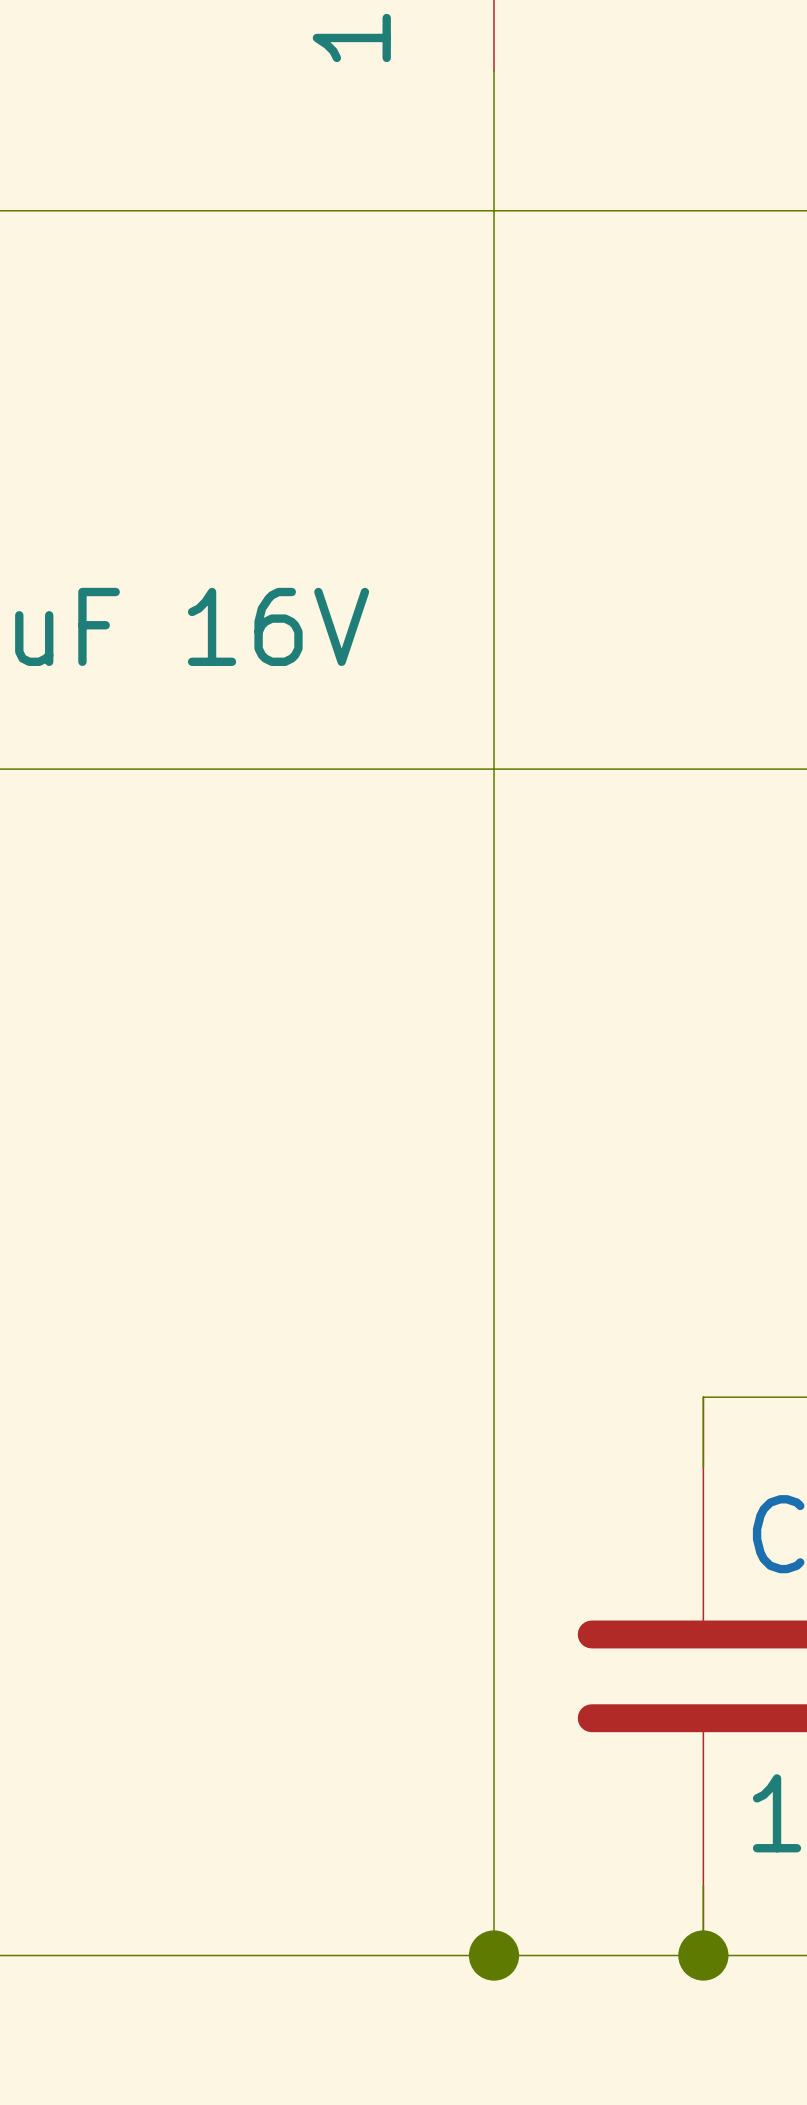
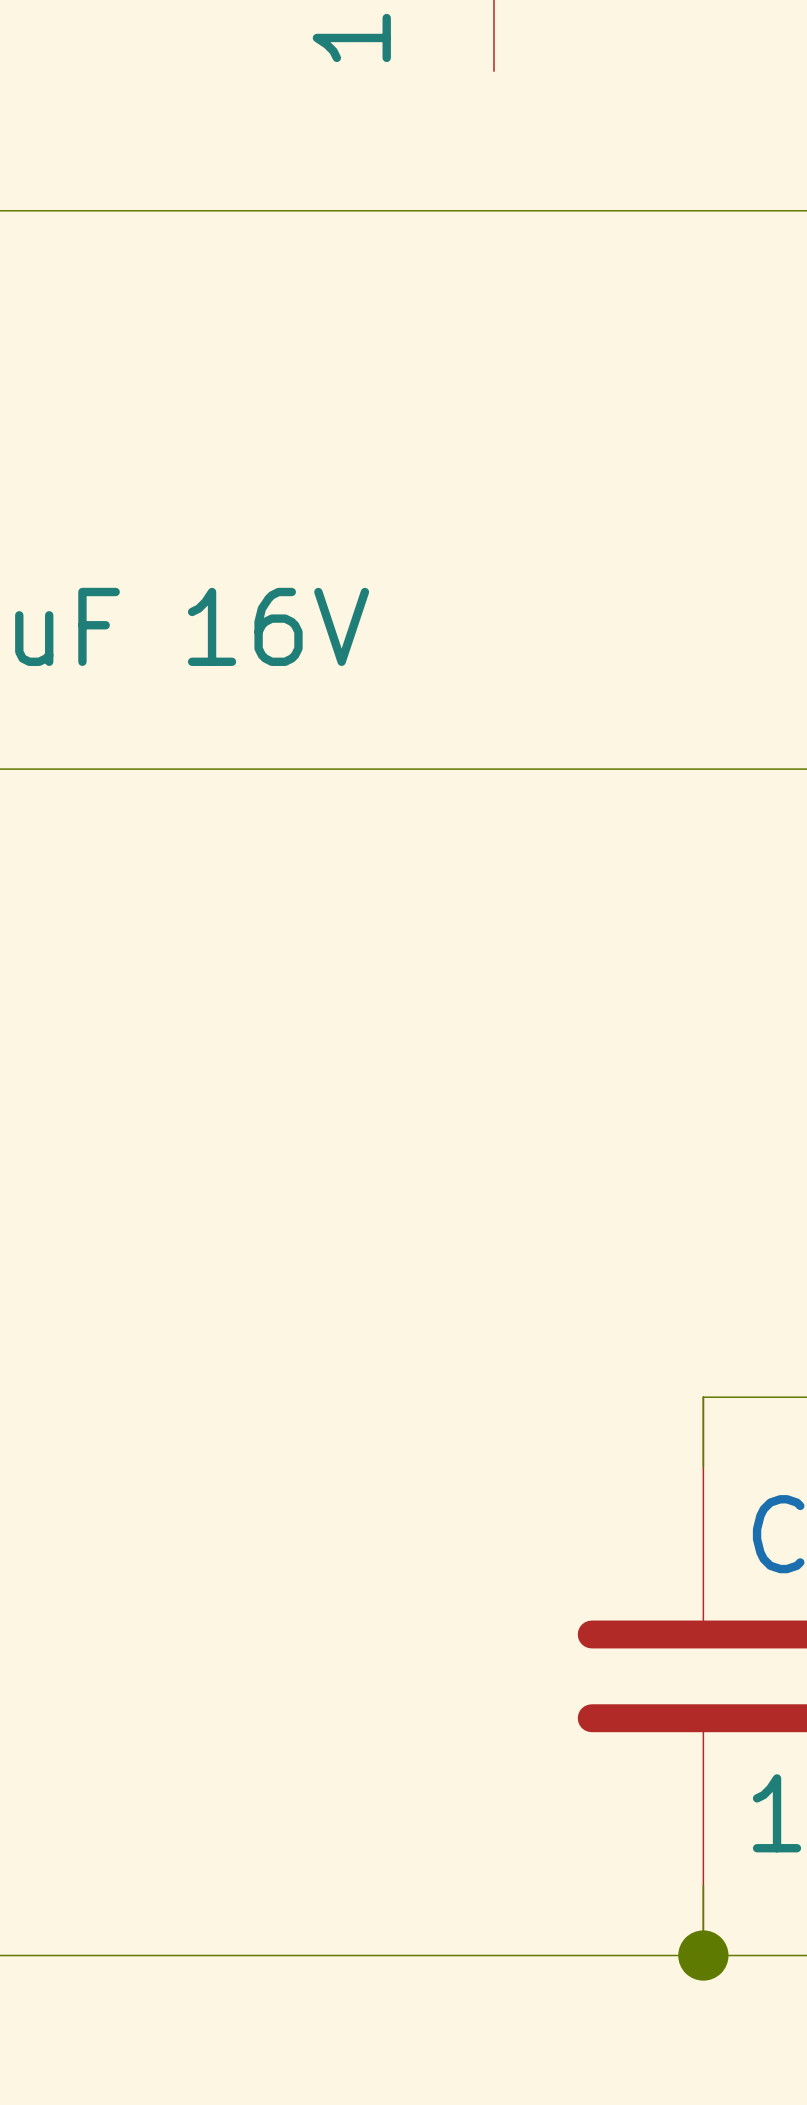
wire: (494, 71) (494, 1955) -> none
junction: (494, 1955) -> none

